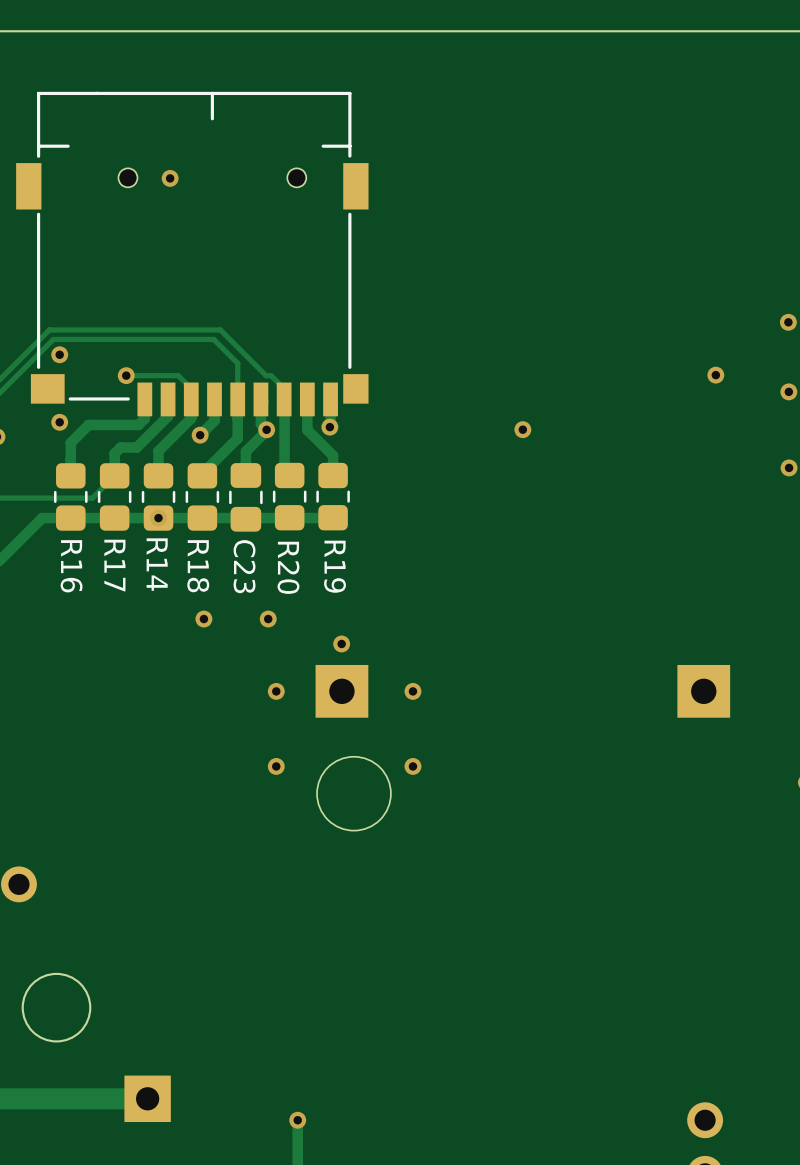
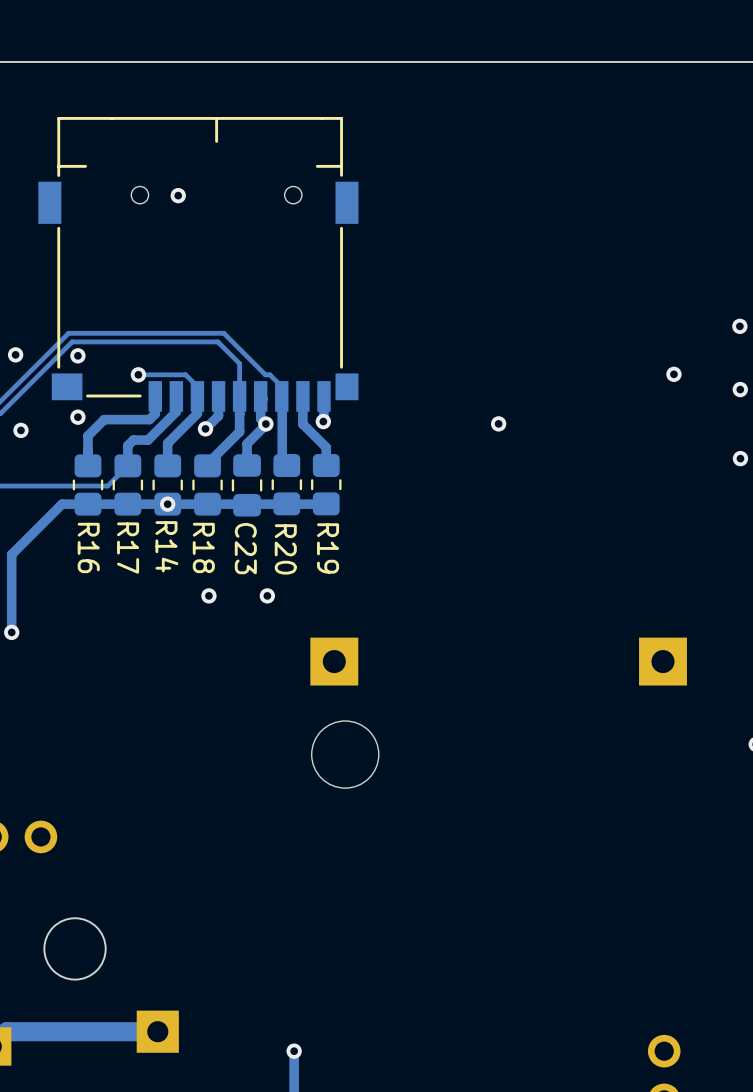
via: (341, 643) -> none
via: (276, 691) -> none
via: (412, 691) -> none
via: (276, 766) -> none
via: (412, 766) -> none

